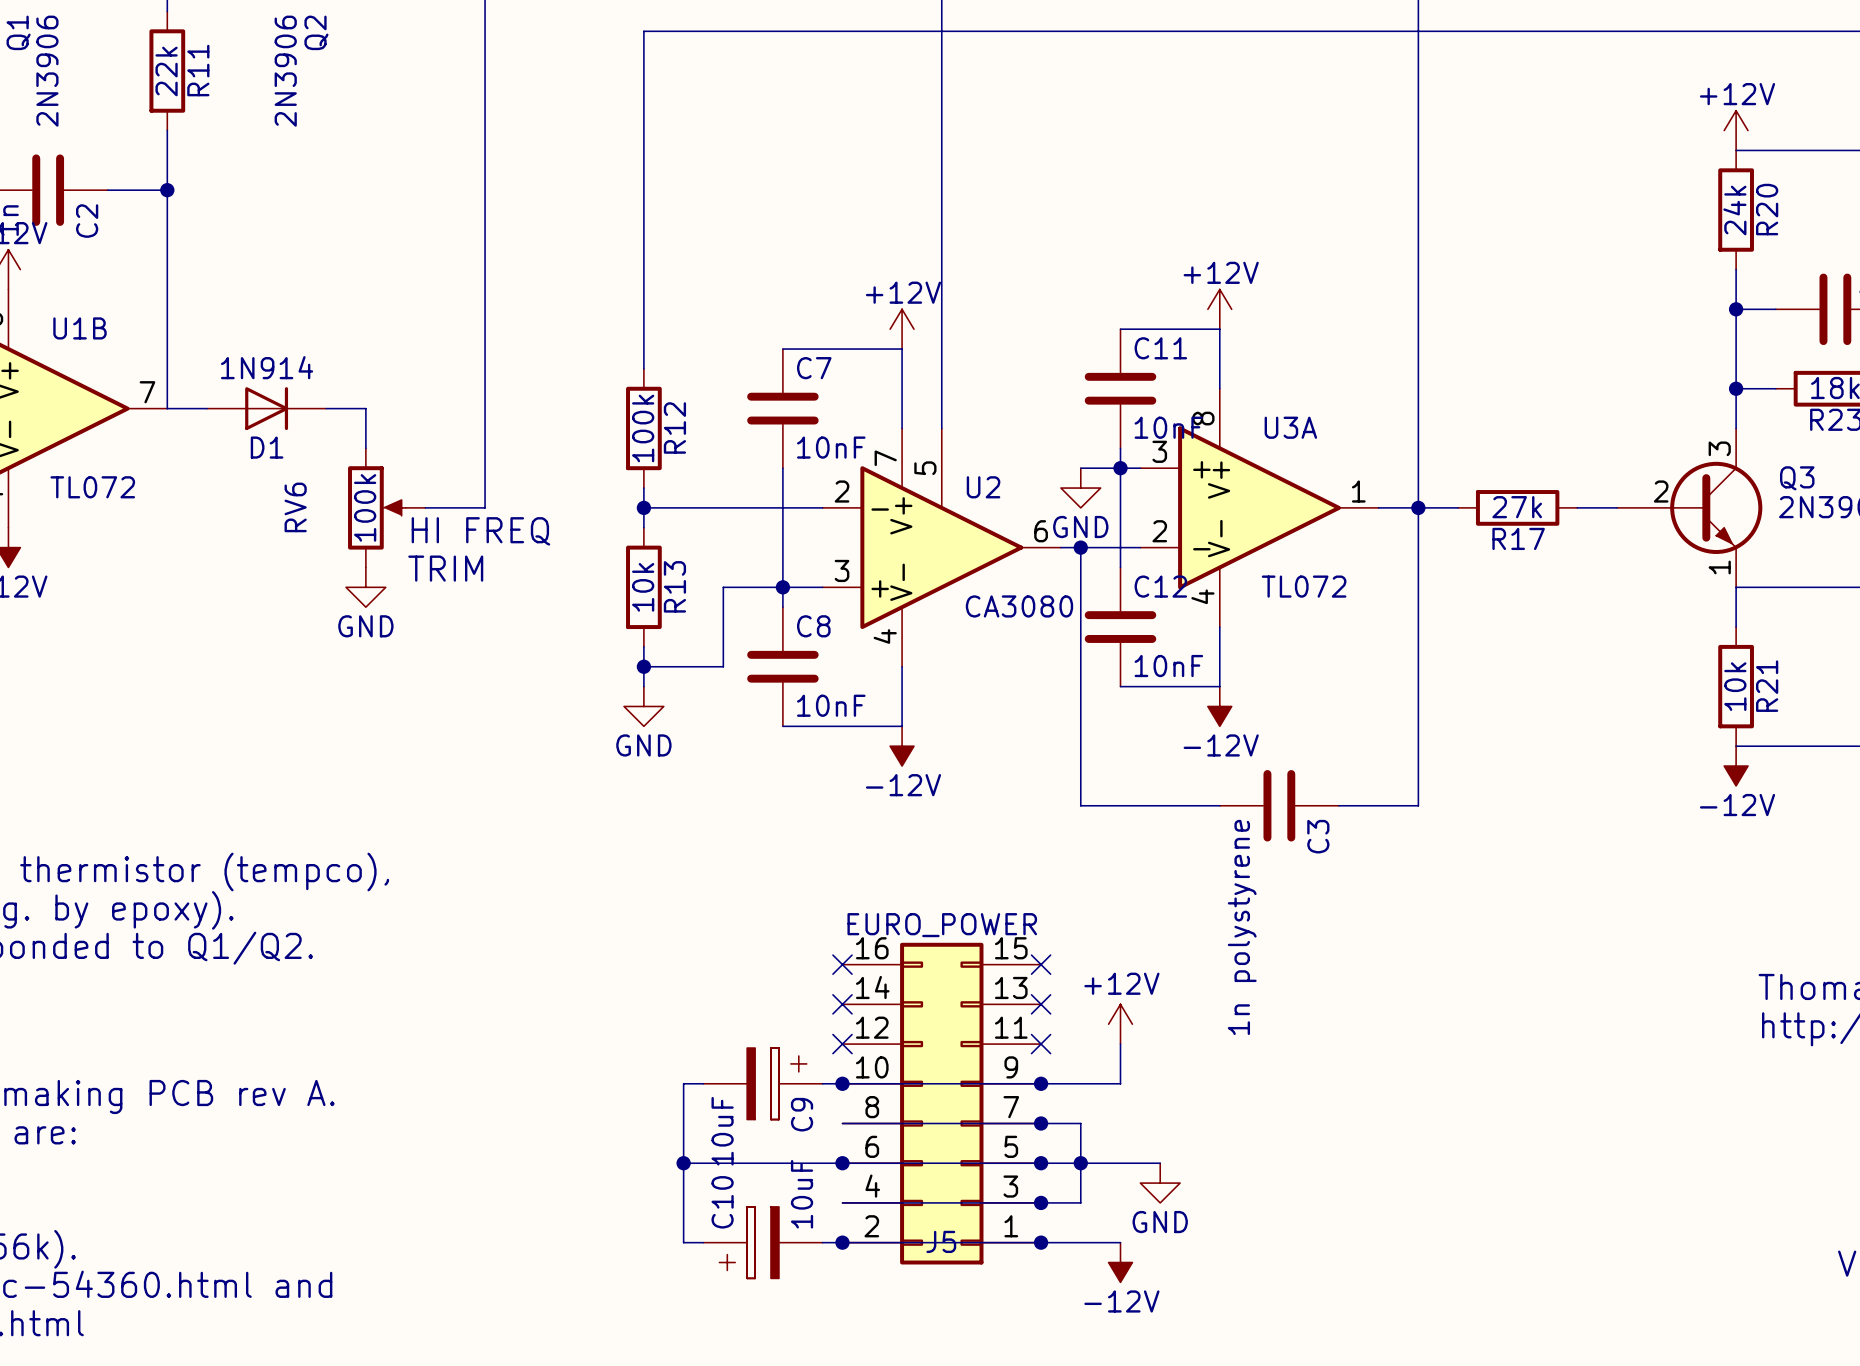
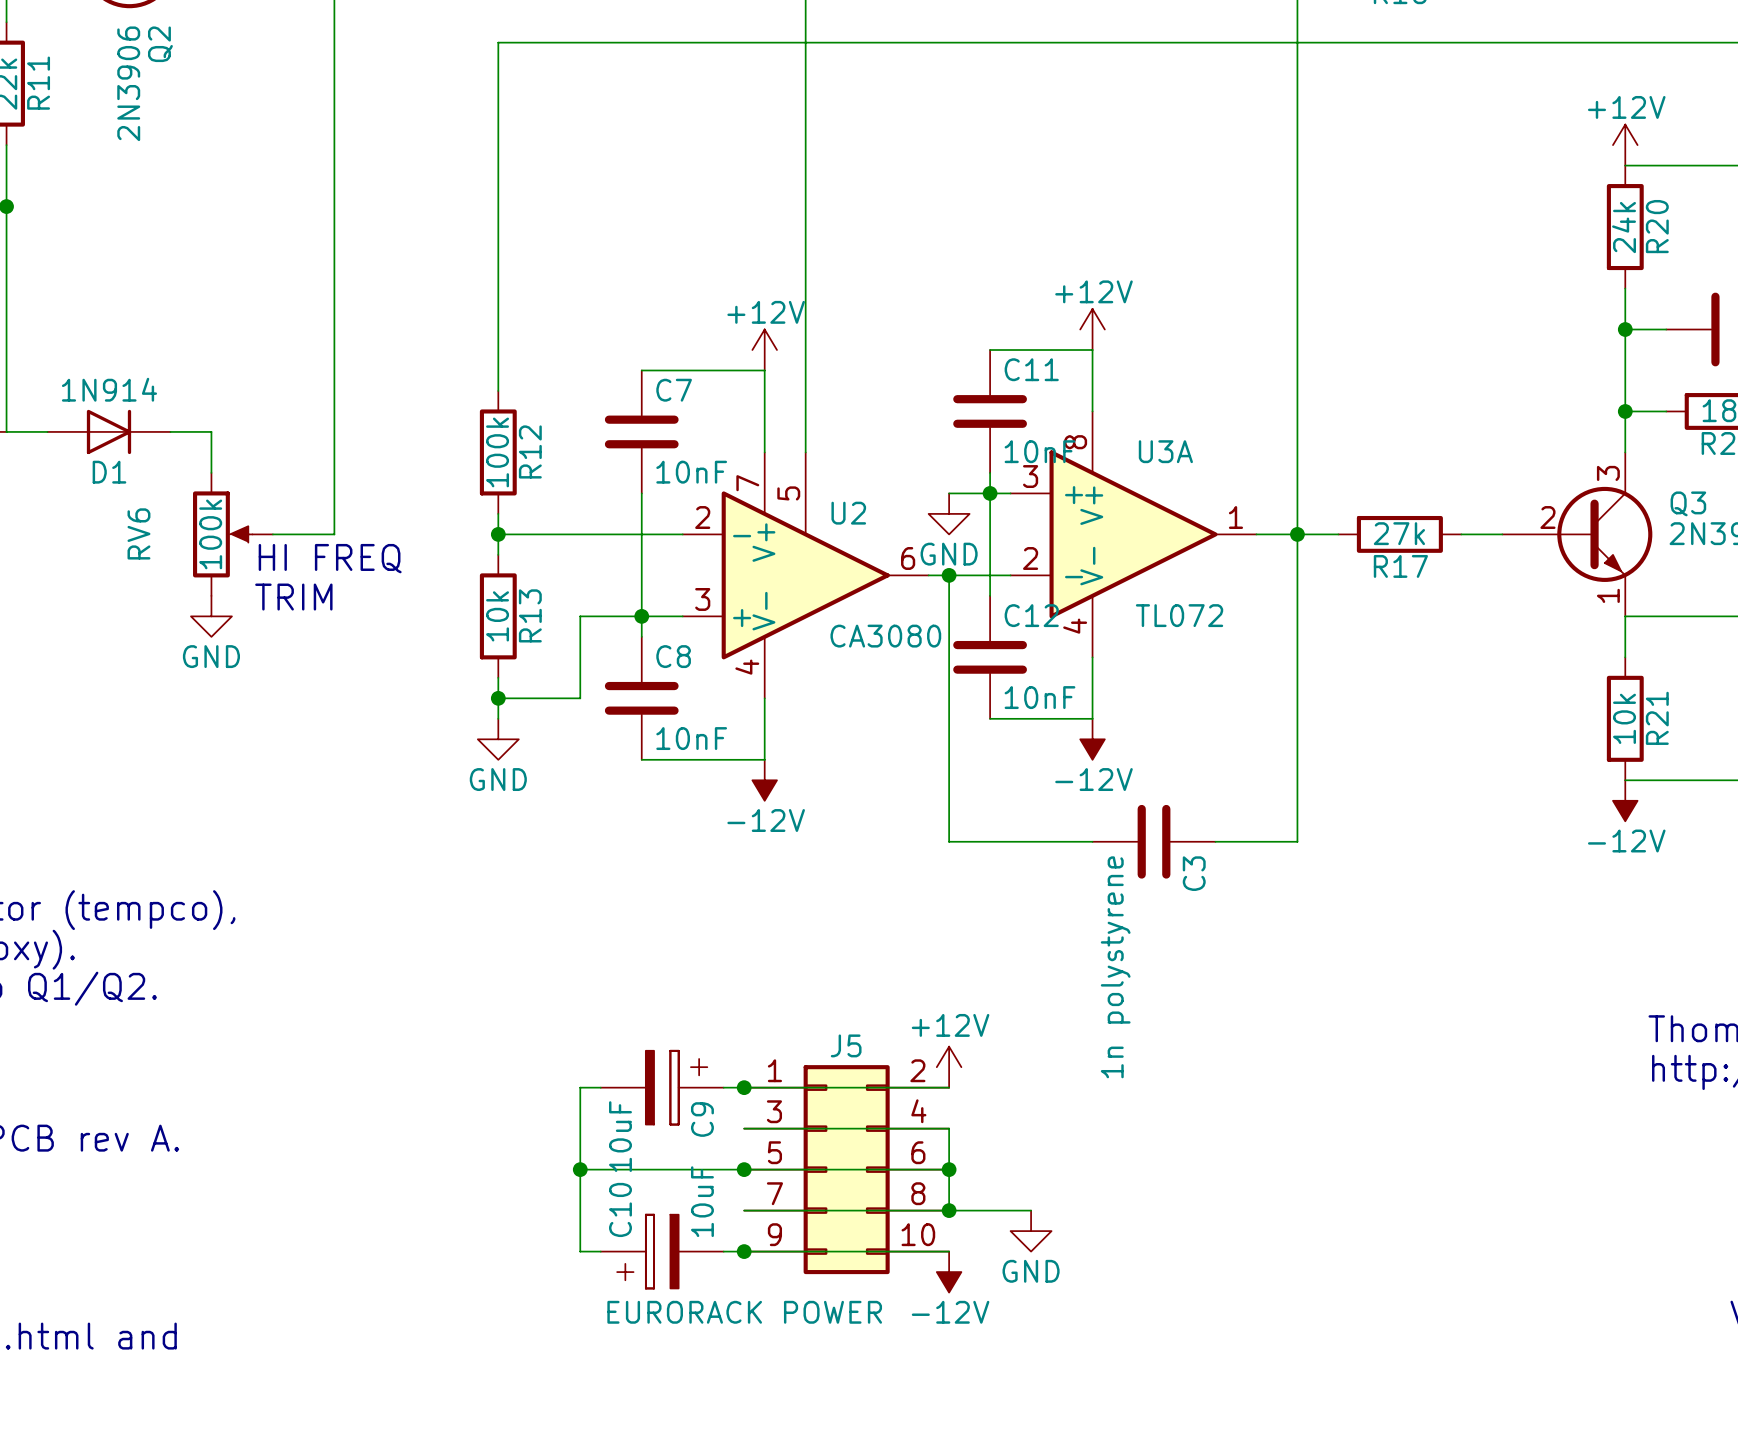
J5 value: EURO_POWER (942, 925) -> EURORACK POWER (744, 1312)
J5 symbol: [842, 942, 1042, 1265] -> [744, 1065, 950, 1275]
no-connect mark: (842, 964) -> none
no-connect mark: (1041, 964) -> none
no-connect mark: (842, 1004) -> none
no-connect mark: (1041, 1004) -> none
power symbol position: +12V (1120, 1024) -> +12V (949, 1067)
no-connect mark: (842, 1044) -> none
junction: none -> (744, 1087)
no-connect mark: (1041, 1044) -> none
wire: (1120, 1044) (1120, 1083) (1080, 1083) -> (949, 1169) (949, 1128)
wire: (703, 1083) (683, 1083) (683, 1242) (703, 1242) -> (600, 1087) (580, 1087) (580, 1251) (600, 1251)
C9 position: (763, 1083) -> (662, 1087)
wire: (822, 1083) (882, 1083) -> none
junction: (842, 1083) -> none
junction: (1041, 1083) -> none
wire: none -> (580, 1169) (703, 1169)
junction: none -> (744, 1169)
junction: (1041, 1123) -> none
junction: none -> (949, 1169)
wire: (683, 1163) (882, 1163) -> none
junction position: (683, 1163) -> (580, 1169)
junction: (842, 1163) -> none
junction: (1041, 1163) -> none
wire: (1080, 1163) (1080, 1202) -> none
junction: none -> (744, 1251)
junction: (1041, 1202) -> none
J5 name position: J5 (941, 1241) -> J5 (846, 1045)
C10 position: (763, 1242) -> (662, 1251)
wire: (822, 1242) (1120, 1242) -> none
junction: (842, 1242) -> none
junction: (1041, 1242) -> none
power symbol position: -12V (1120, 1262) -> -12V (949, 1272)

